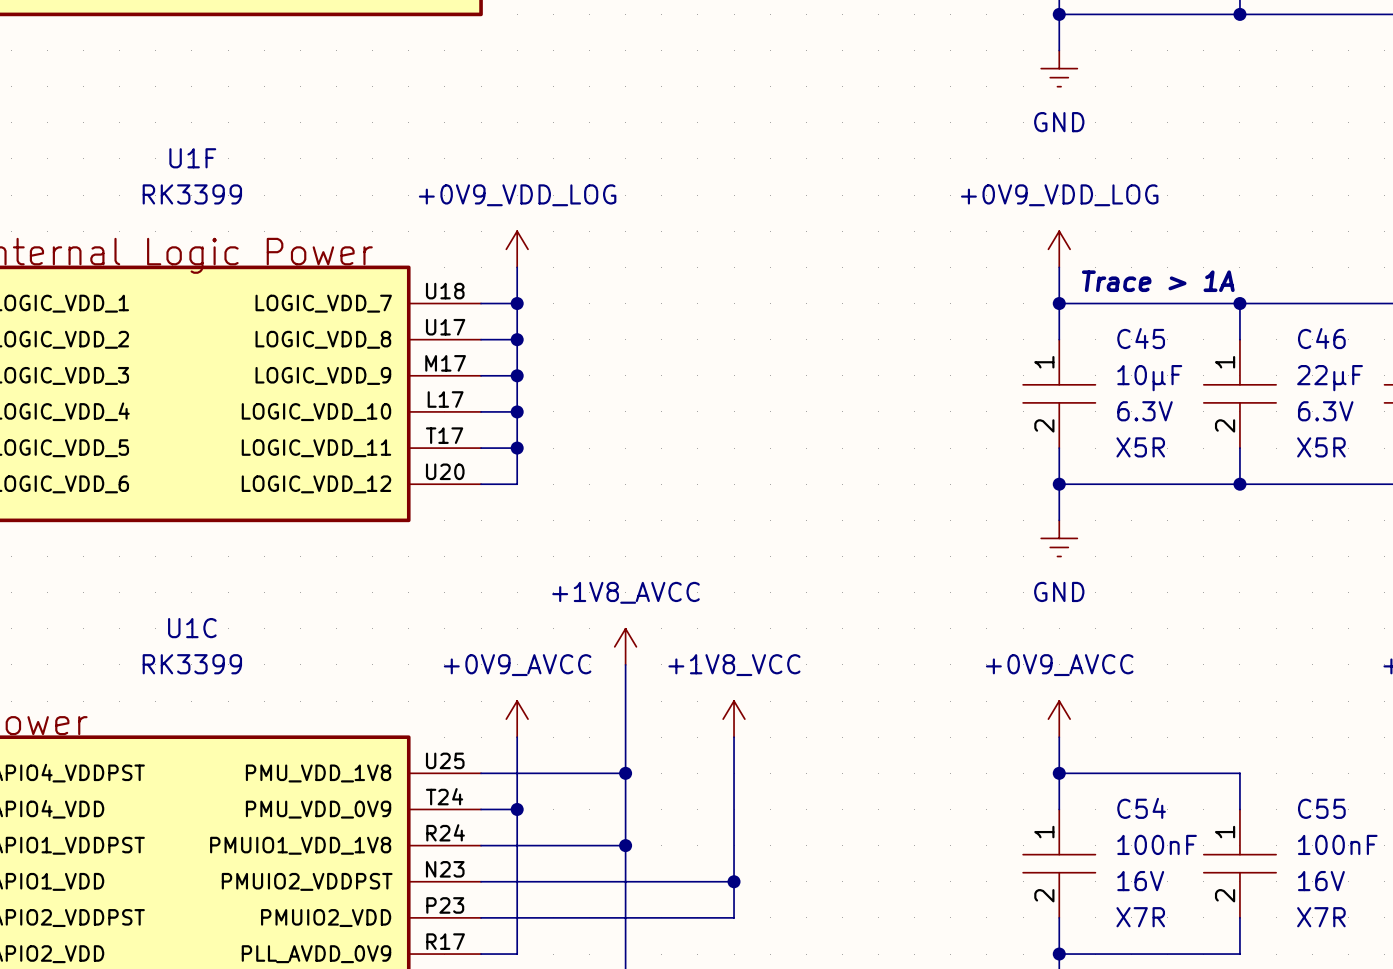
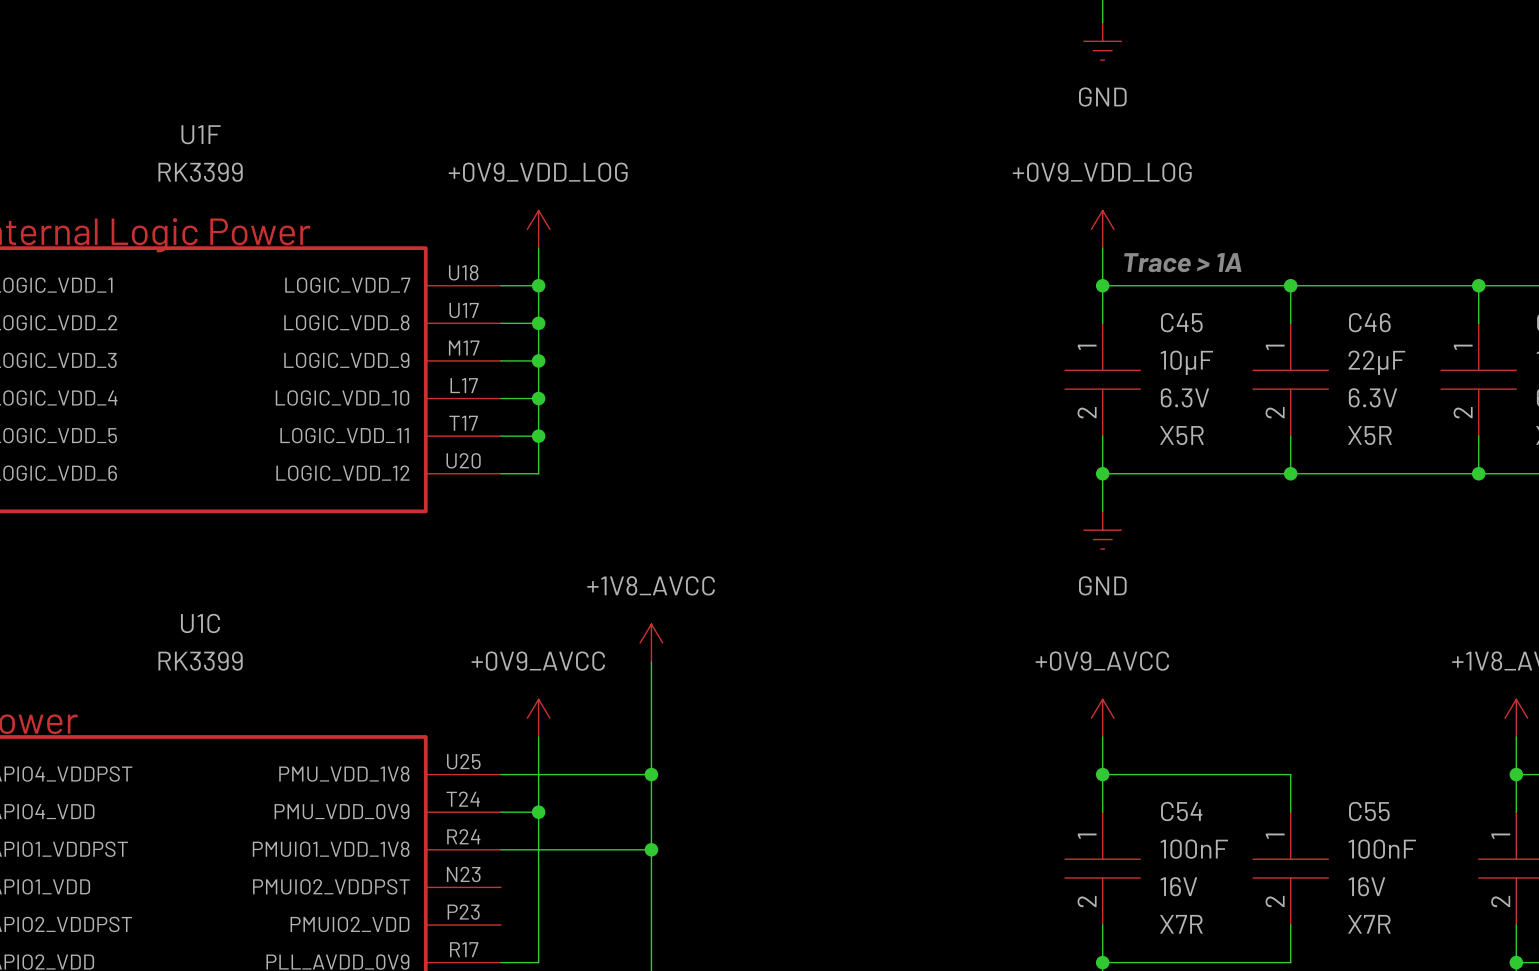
power symbol: +1V8_VCC (734, 719) -> none
wire: (734, 737) (734, 917) (481, 917) -> none
wire: (481, 881) (734, 881) -> none
junction: (734, 881) -> none

